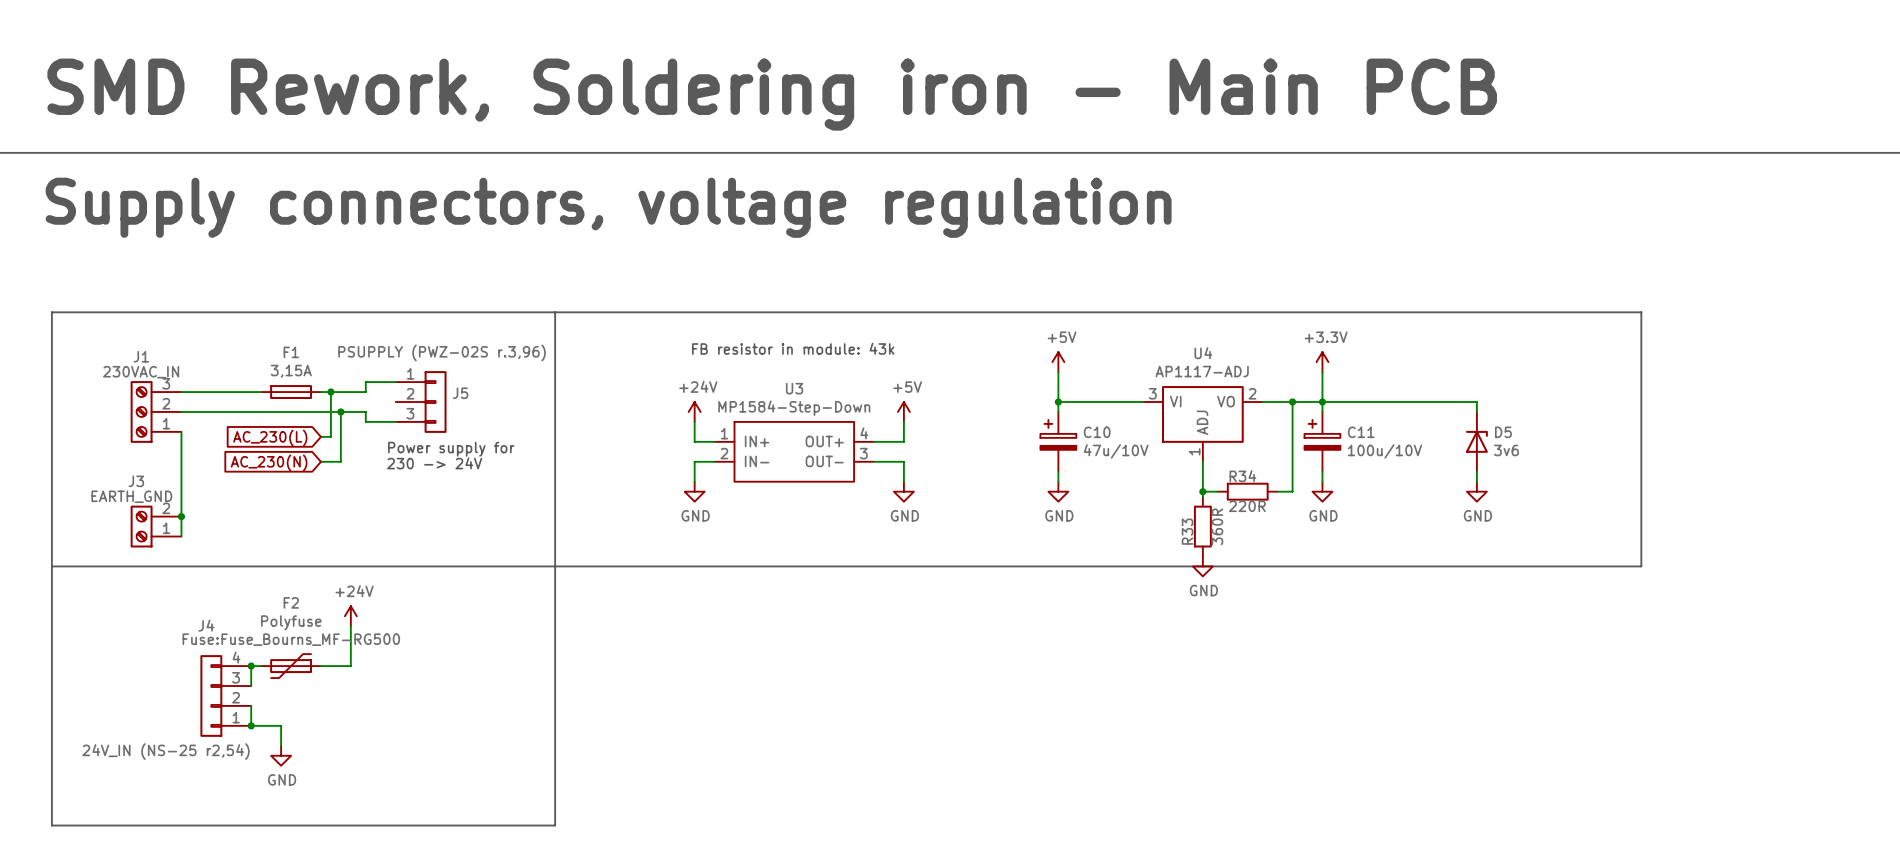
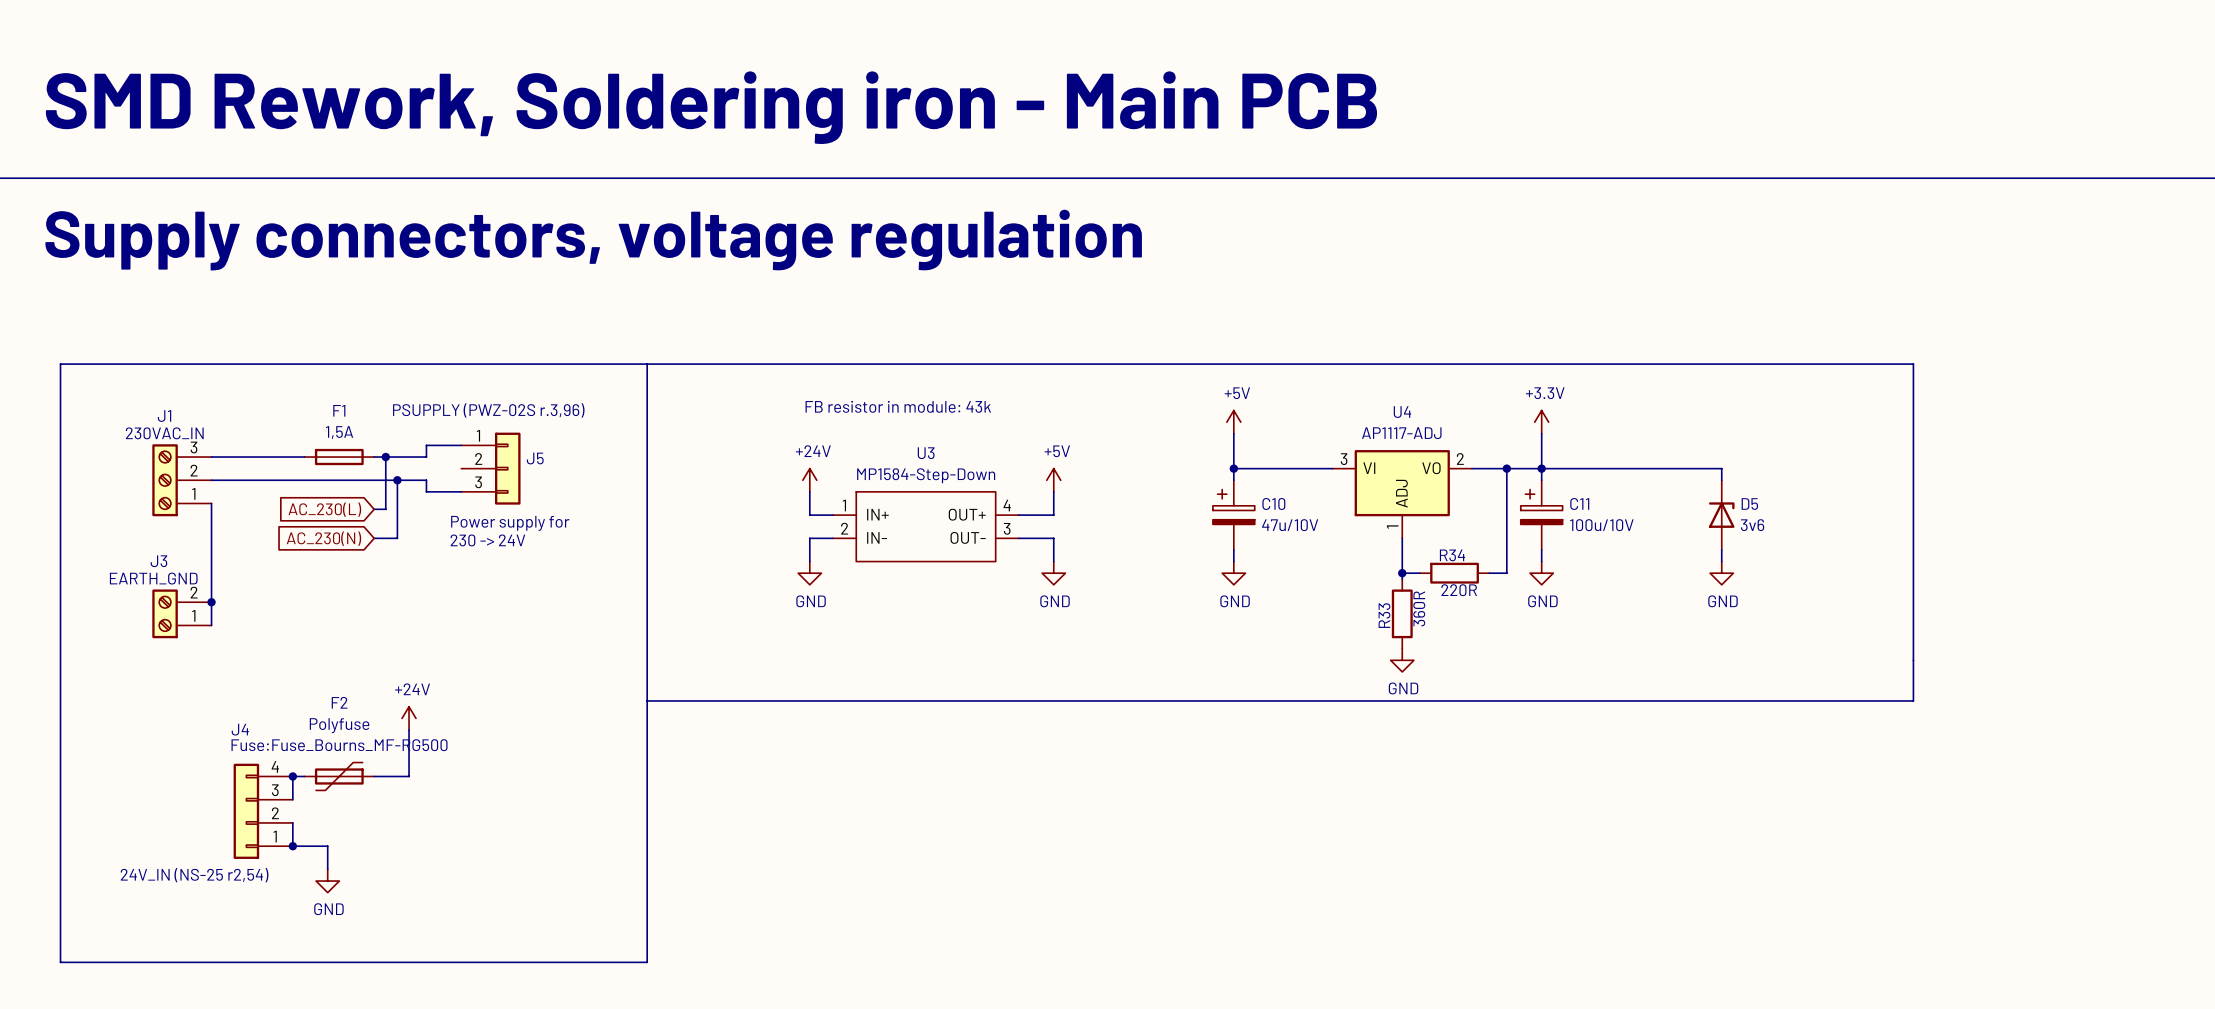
F1 value: 3,15A (291, 371) -> 1,5A (339, 432)
line: (51, 566) (1641, 566) -> (647, 700) (1913, 700) (1913, 660)

